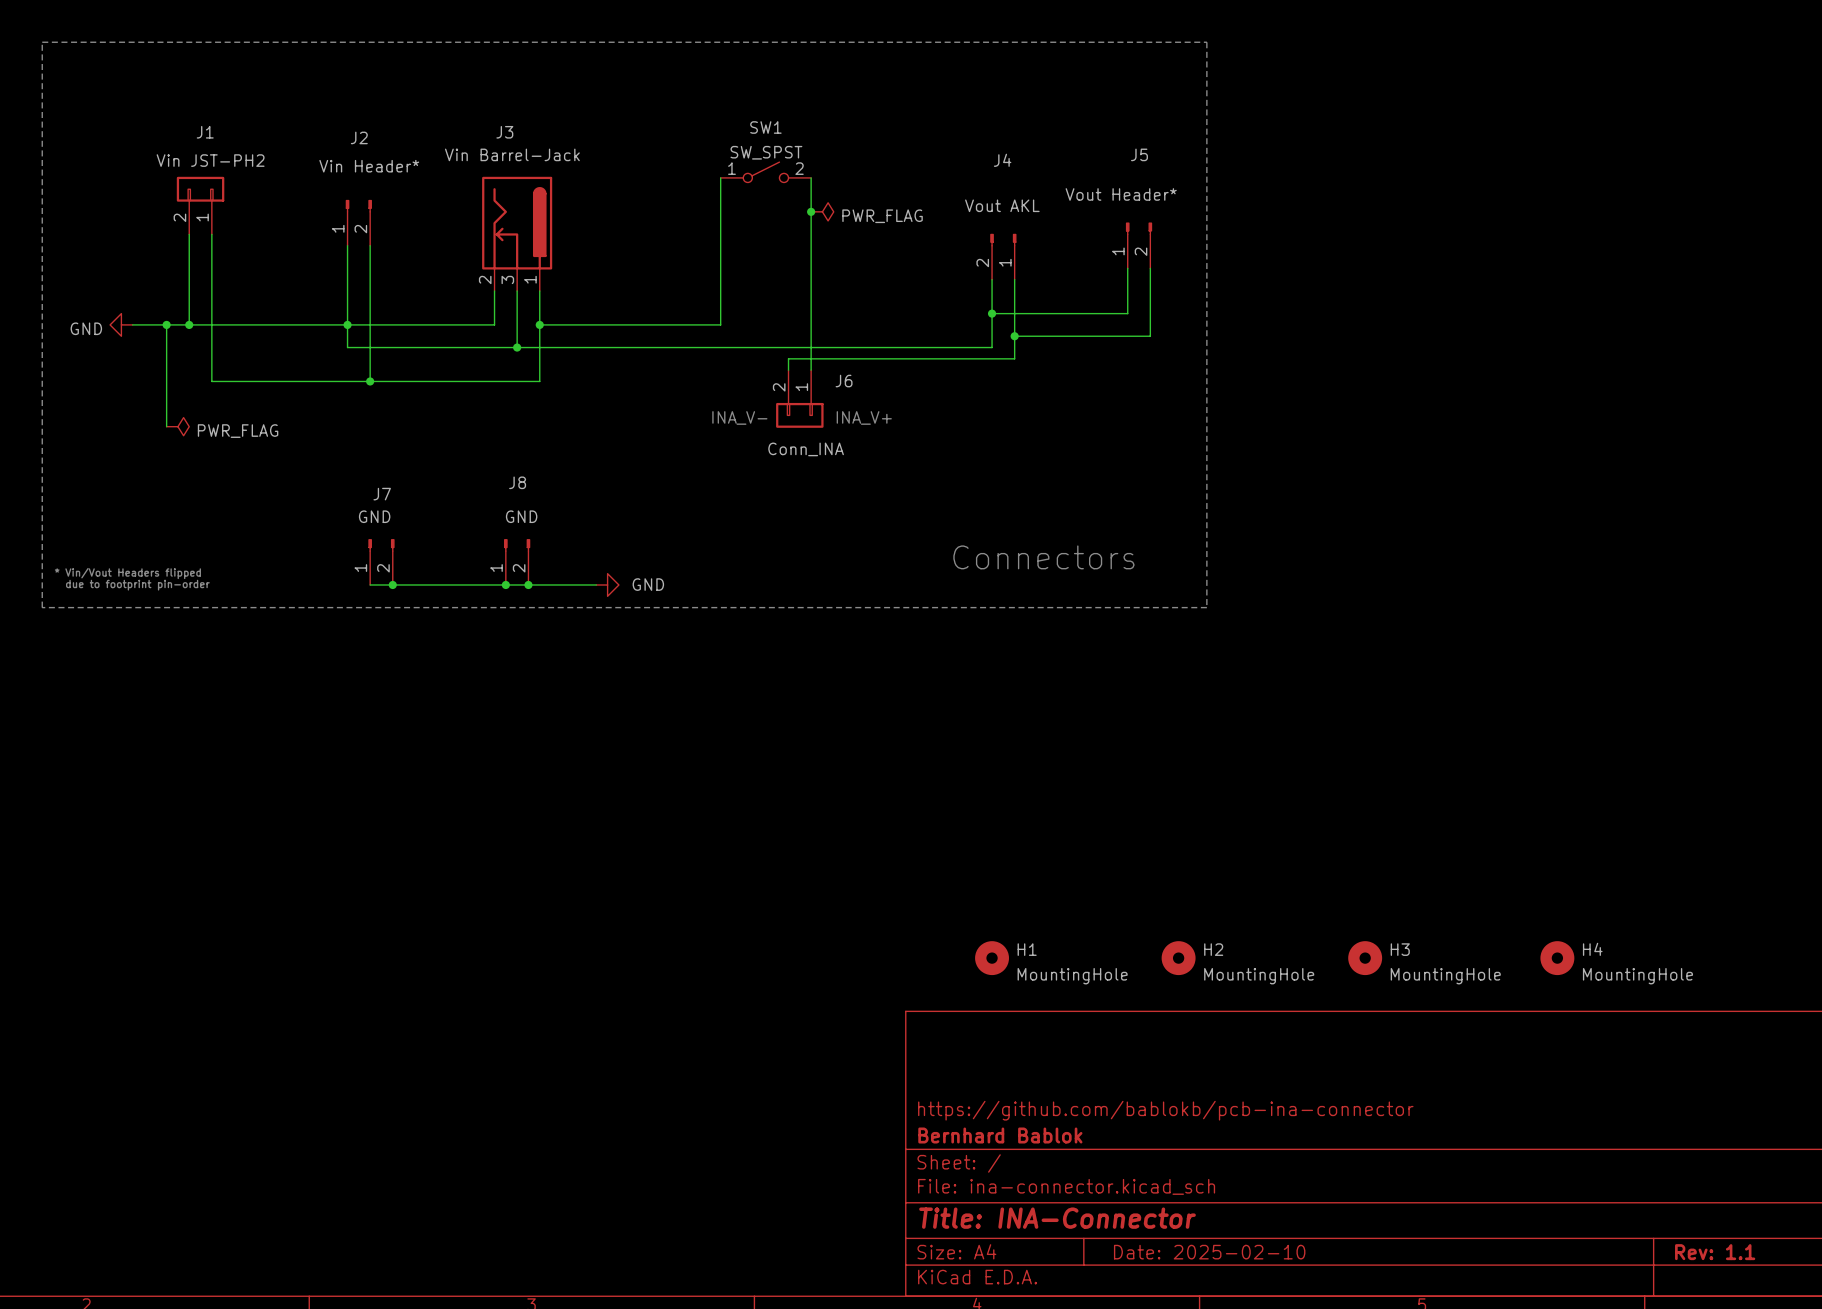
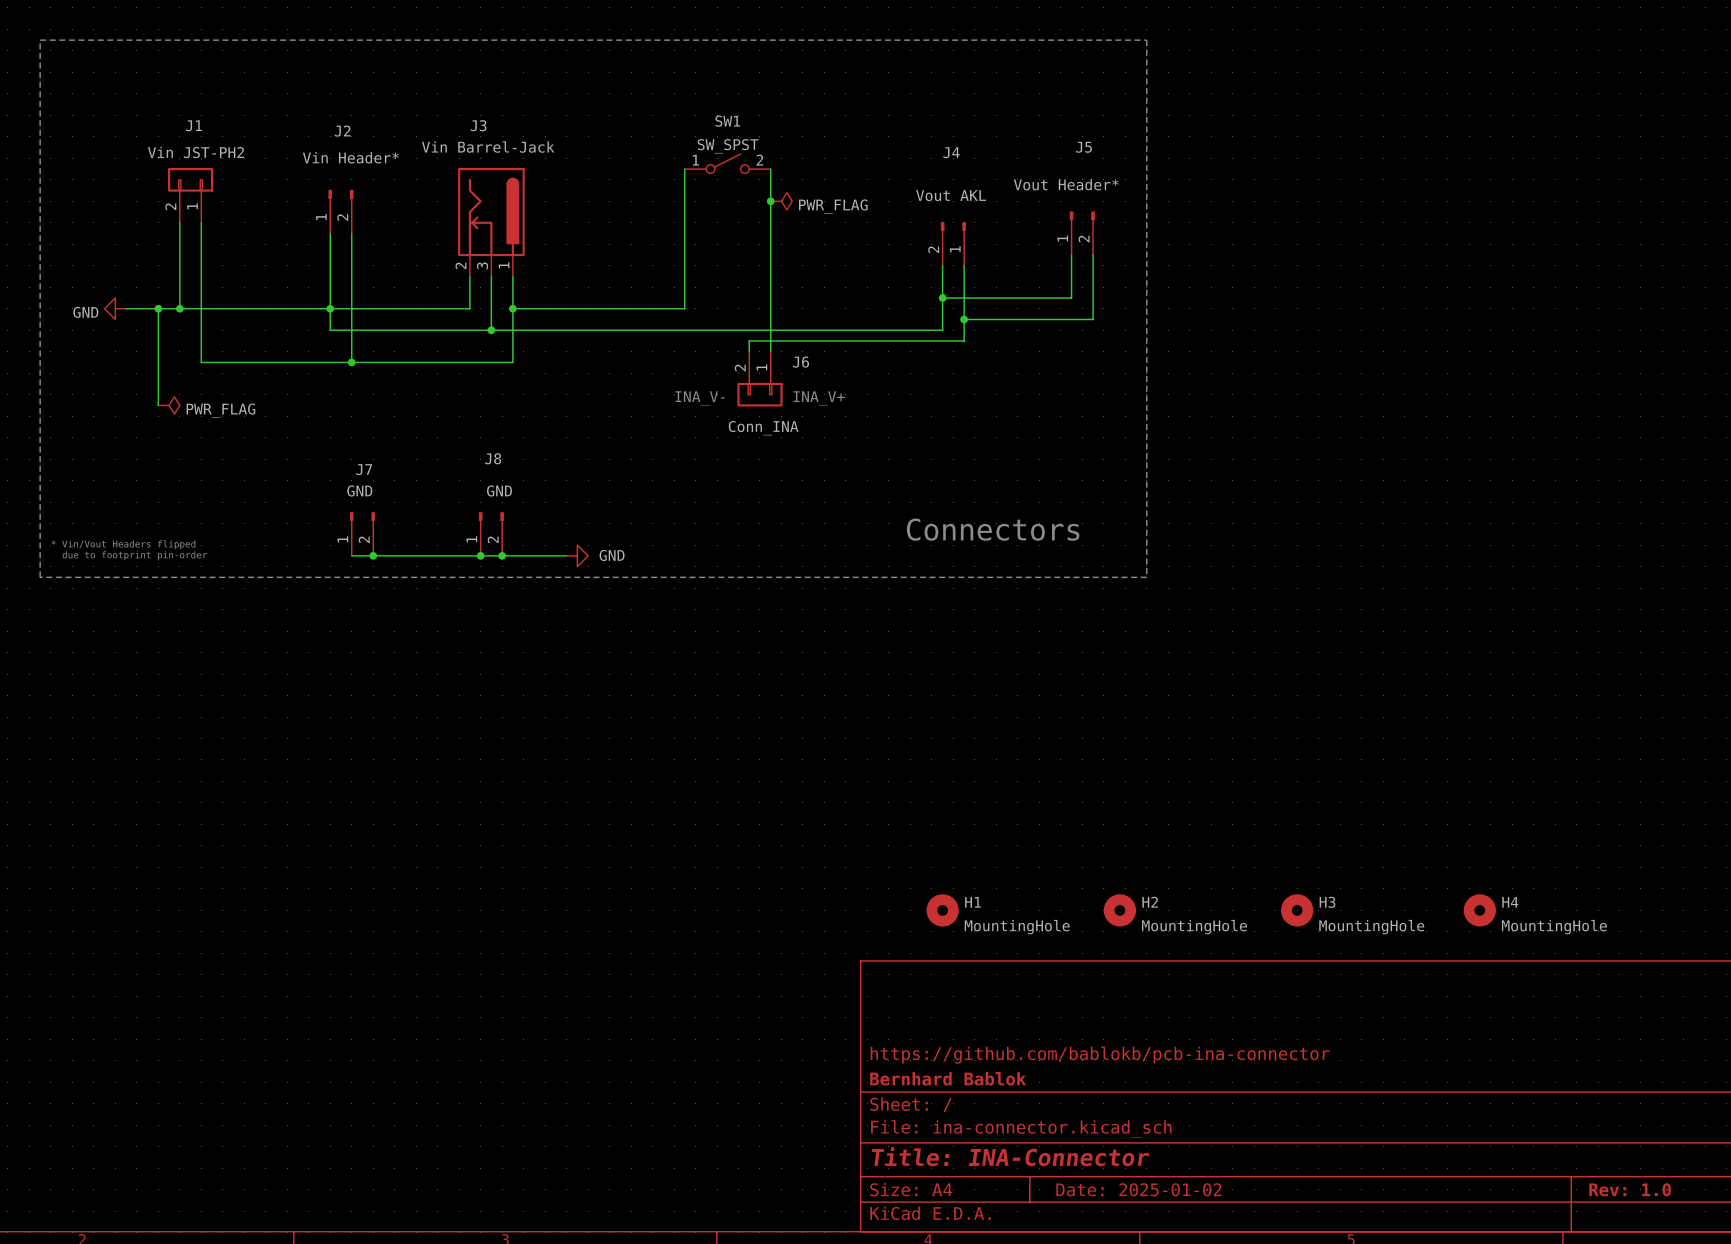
title block: Date: 2025-02-10 (1209, 1252) -> Date: 2025-01-02 (1138, 1189)
title block: Rev: 1.1 (1715, 1252) -> Rev: 1.0 (1630, 1189)

